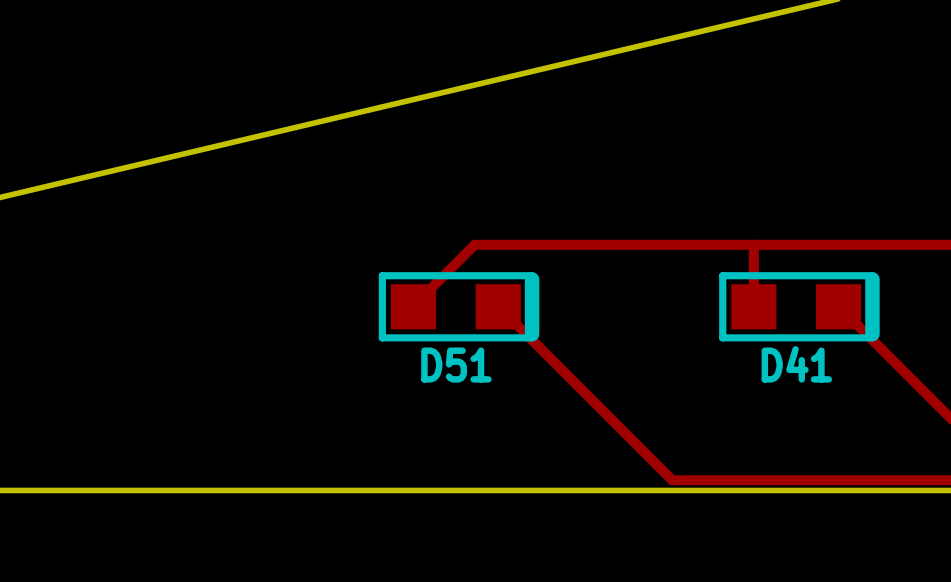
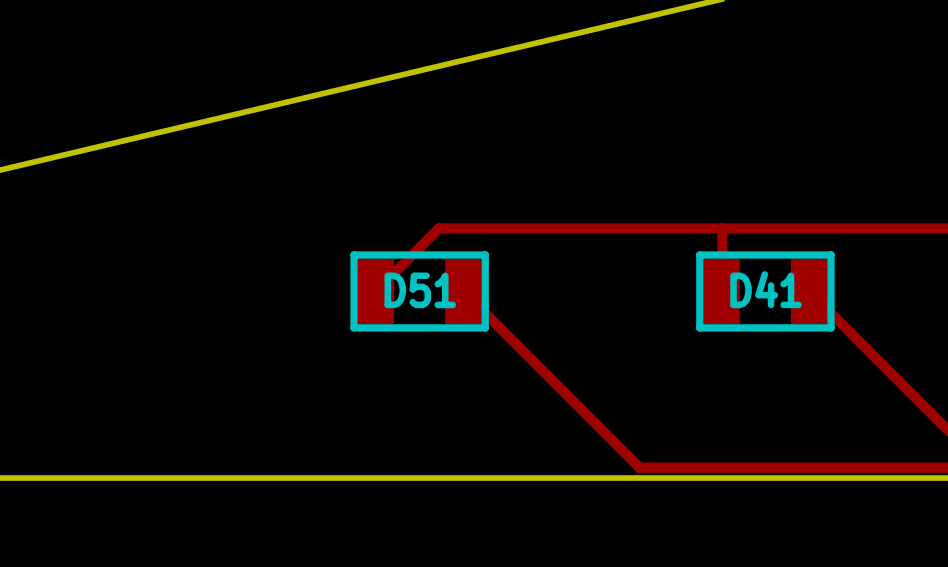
D51 footprint: [378, 272, 540, 342] -> [350, 251, 489, 332]
D41 footprint: [719, 272, 880, 342] -> [696, 251, 835, 332]
D41 name position: D41 (796, 364) -> D41 (766, 289)
D51 name position: D51 (456, 365) -> D51 (420, 290)

